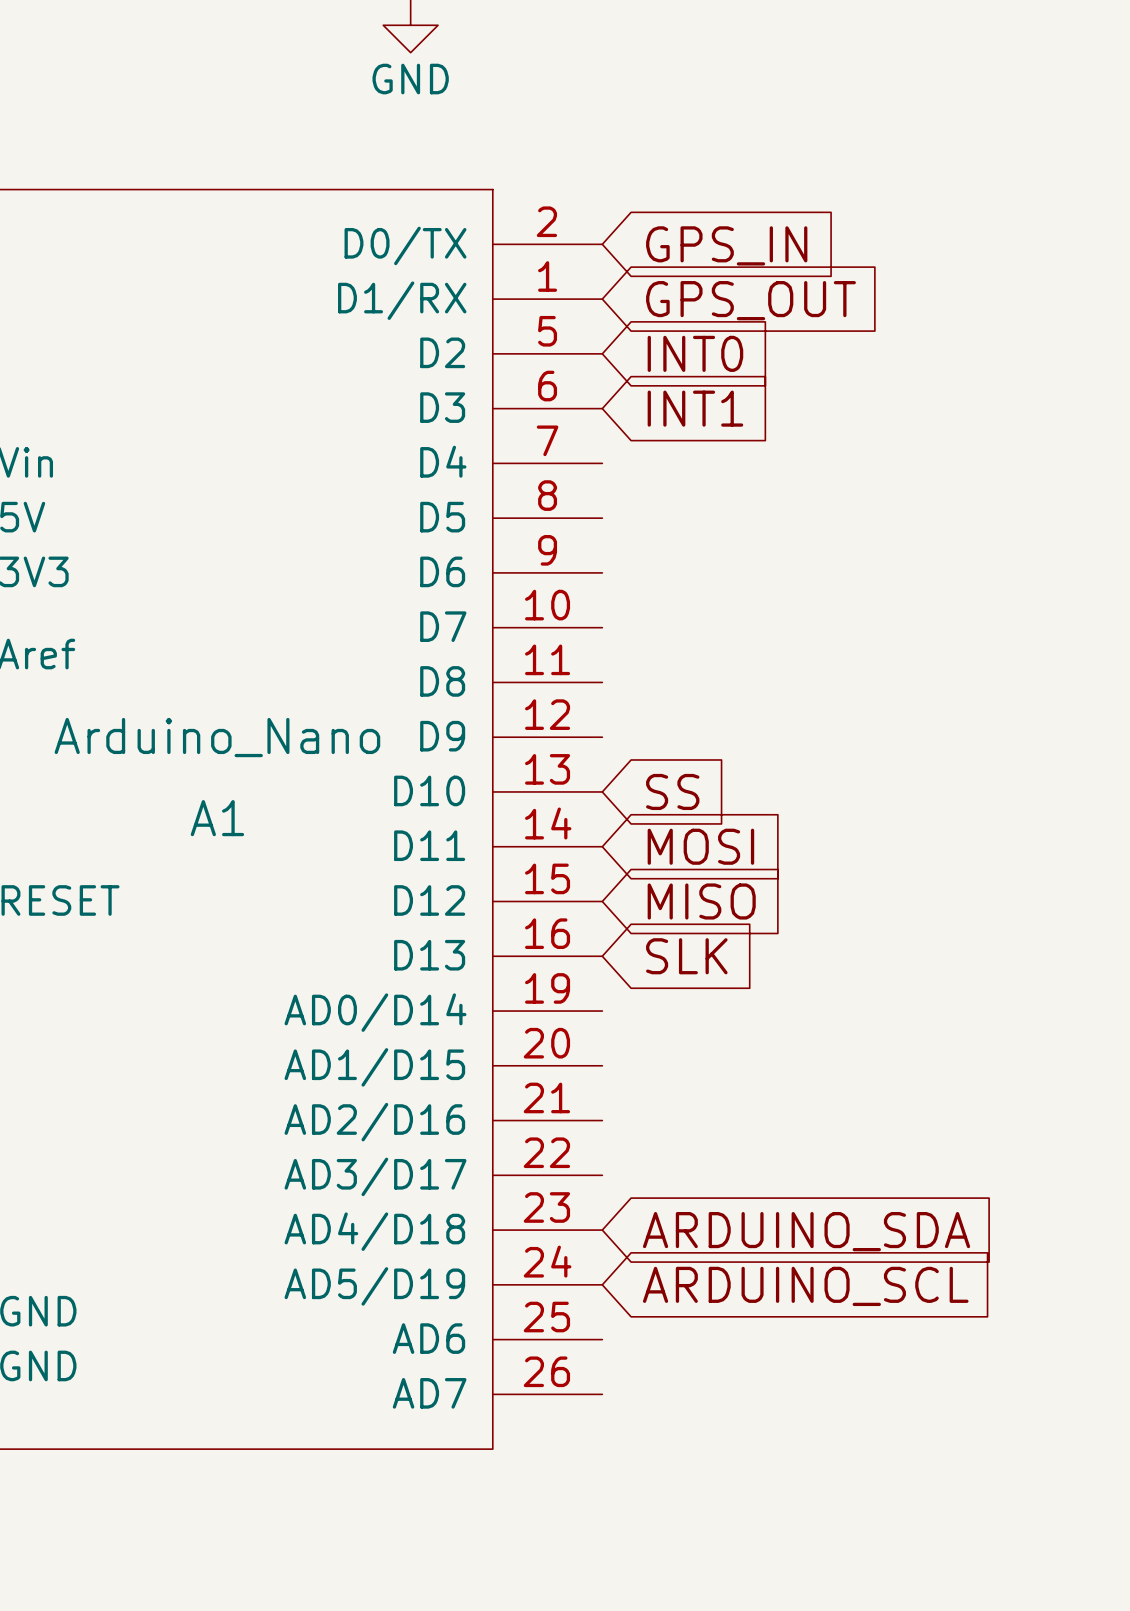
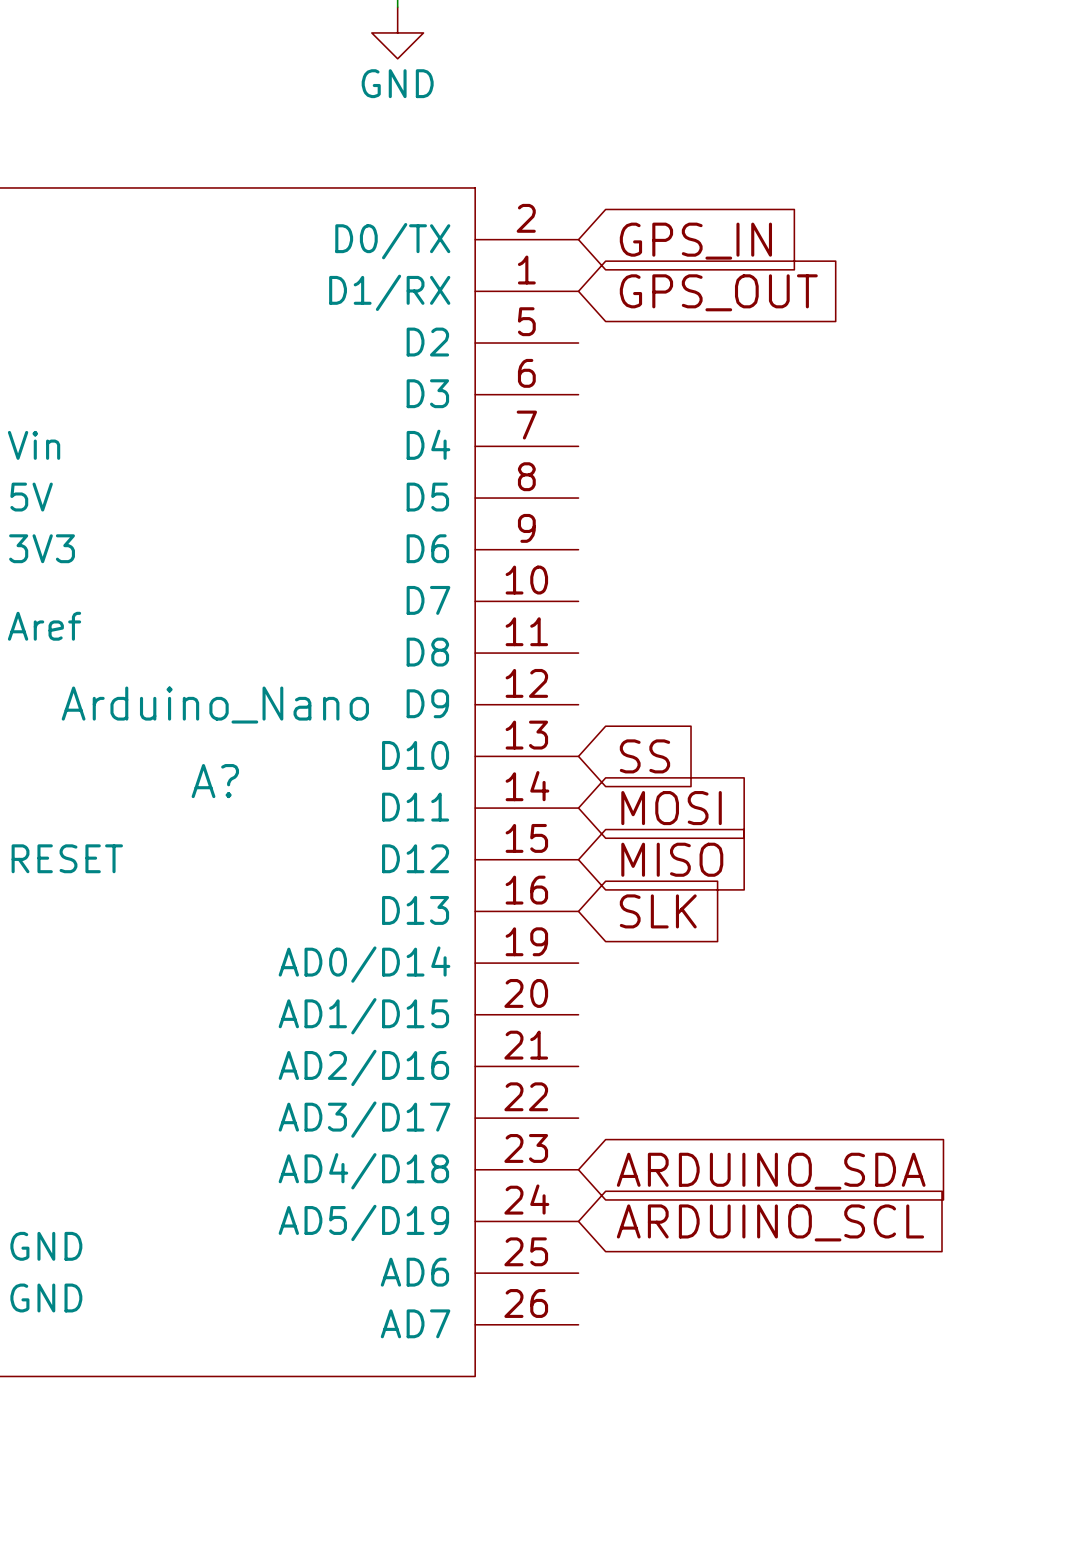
global label: INT0 (695, 353) -> none
global label: INT1 (695, 408) -> none
A1 name: A1 (217, 818) -> A? (215, 781)

